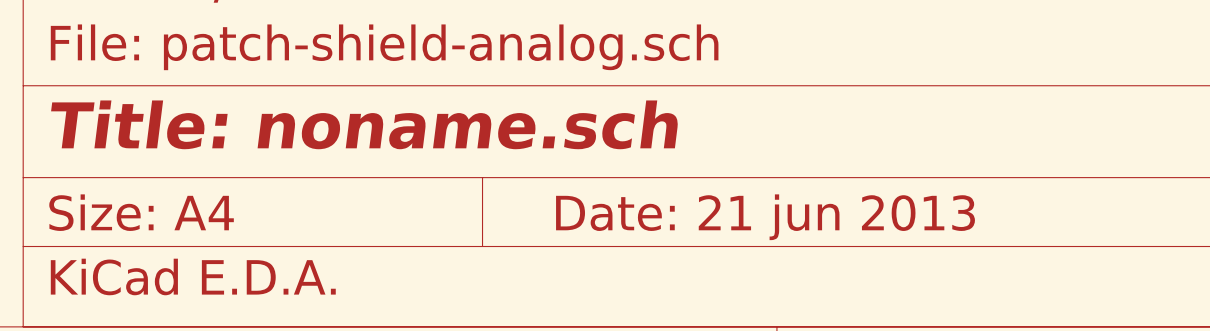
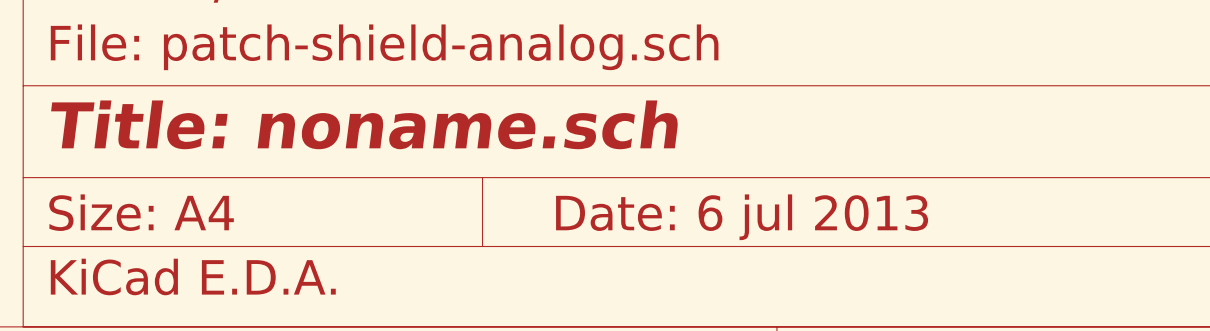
title block: Date: 21 jun 2013 (765, 217) -> Date: 6 jul 2013 (742, 217)

